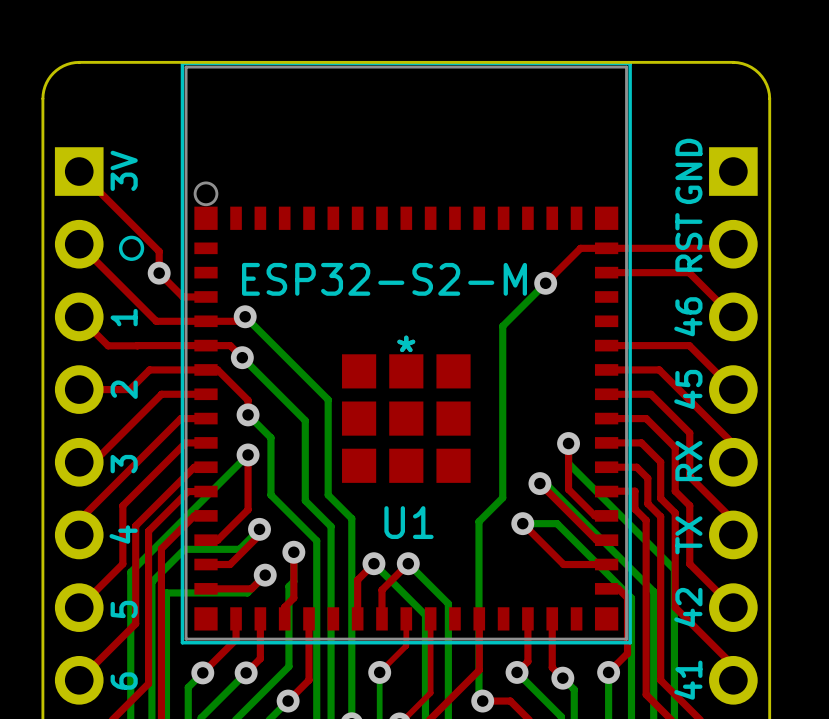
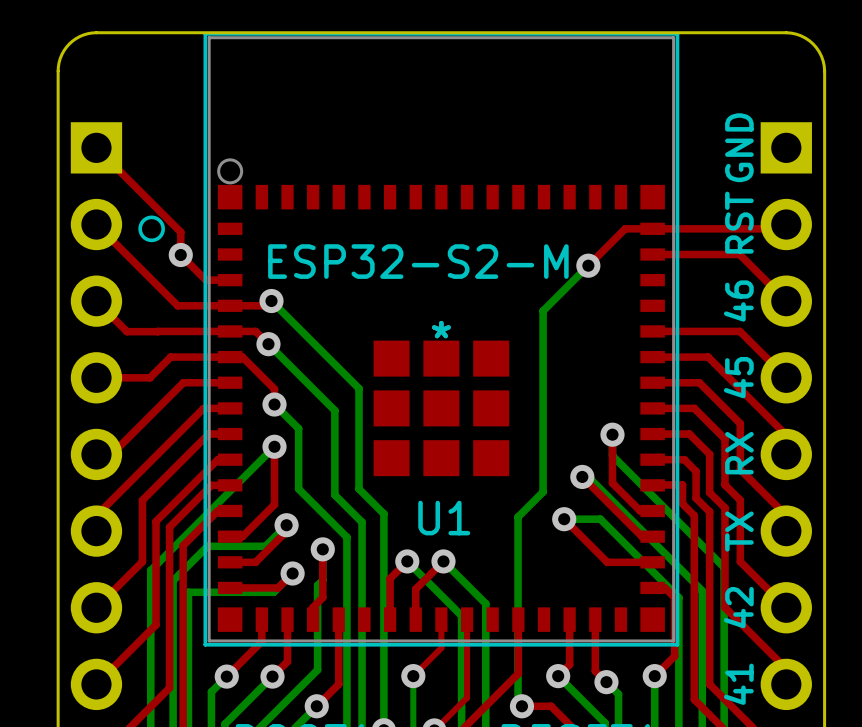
text: 3V (124, 170) -> none
text: 1 (124, 317) -> none
text: 2 (124, 389) -> none
text: 3 (124, 464) -> none
text: 4 (123, 534) -> none
text: 5 (124, 609) -> none
text: 6 (124, 681) -> none

